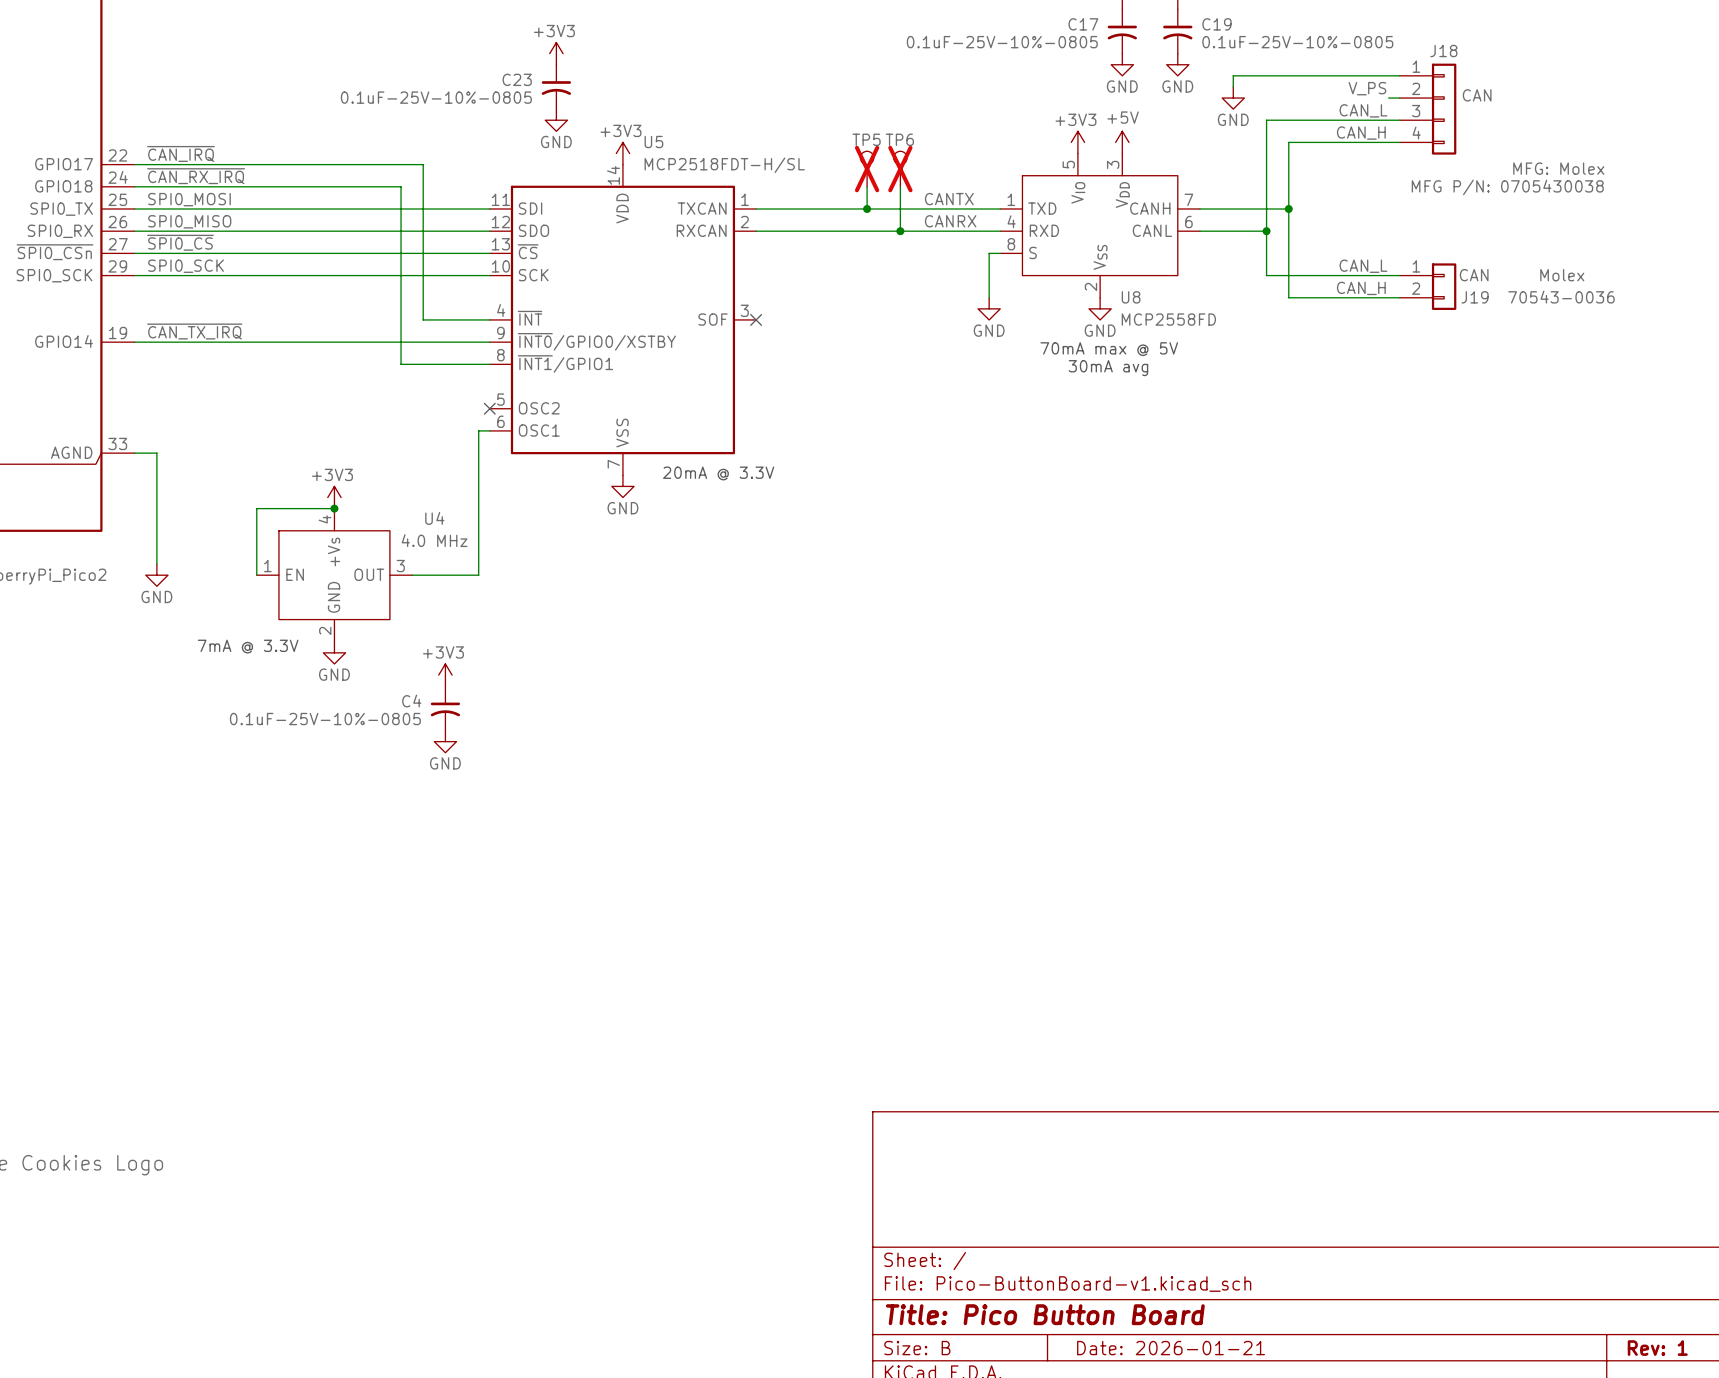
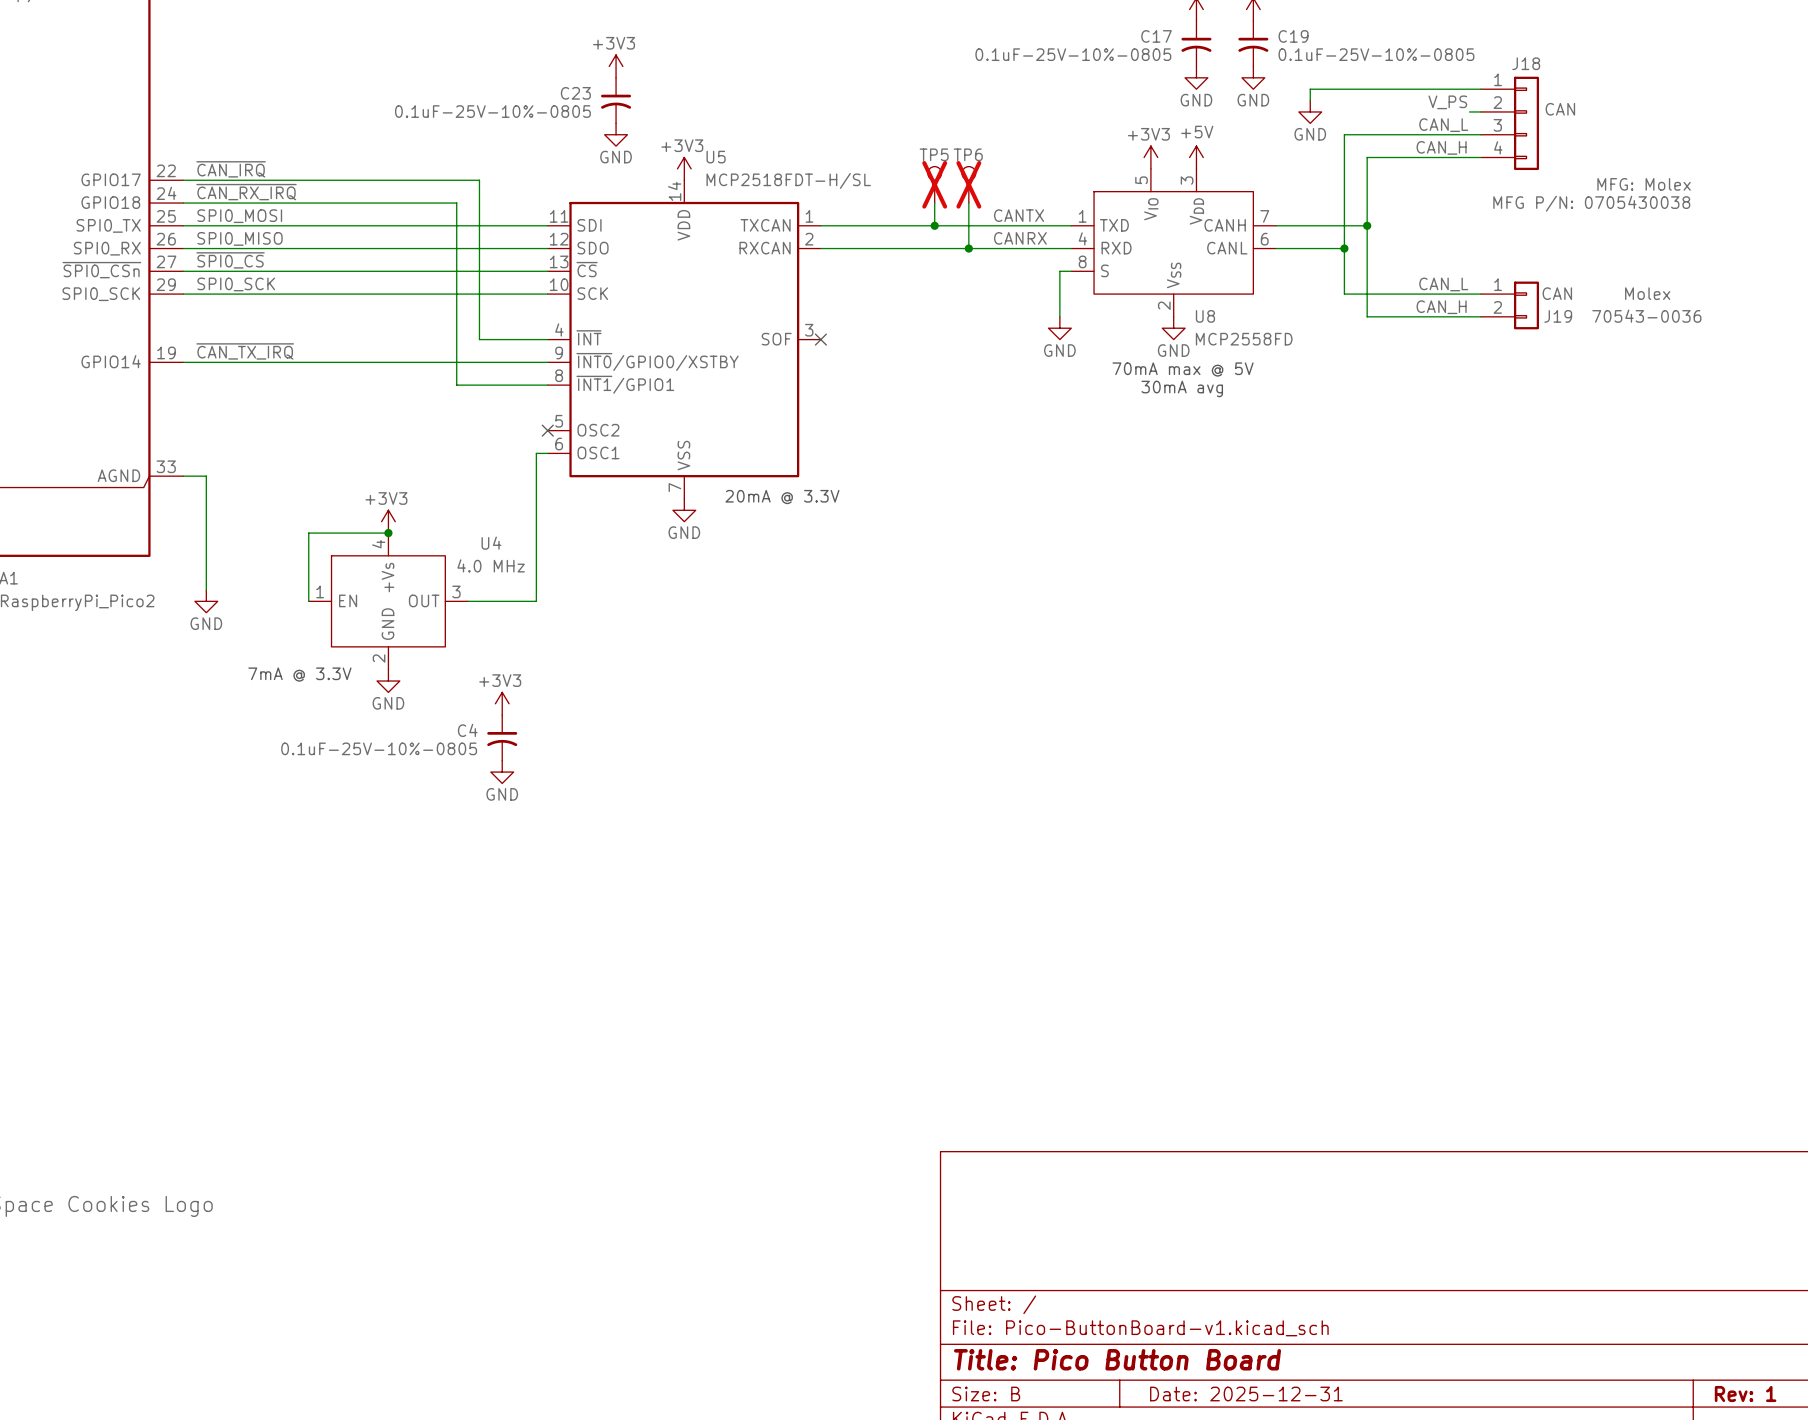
title block: Date: 2026-01-21 (1171, 1348) -> Date: 2025-12-31 (1246, 1394)

